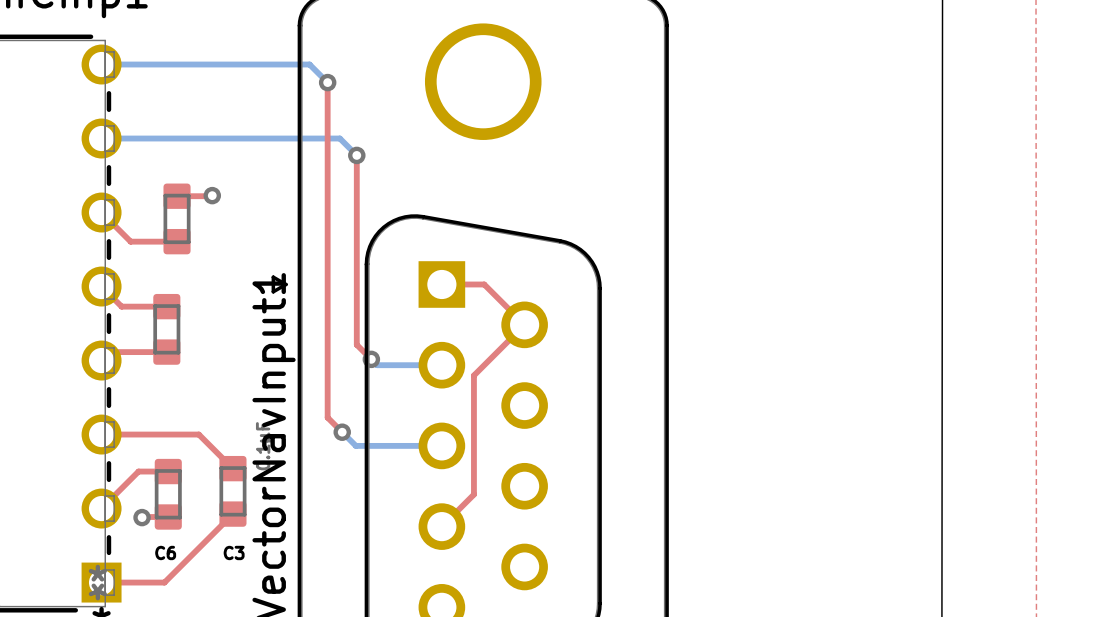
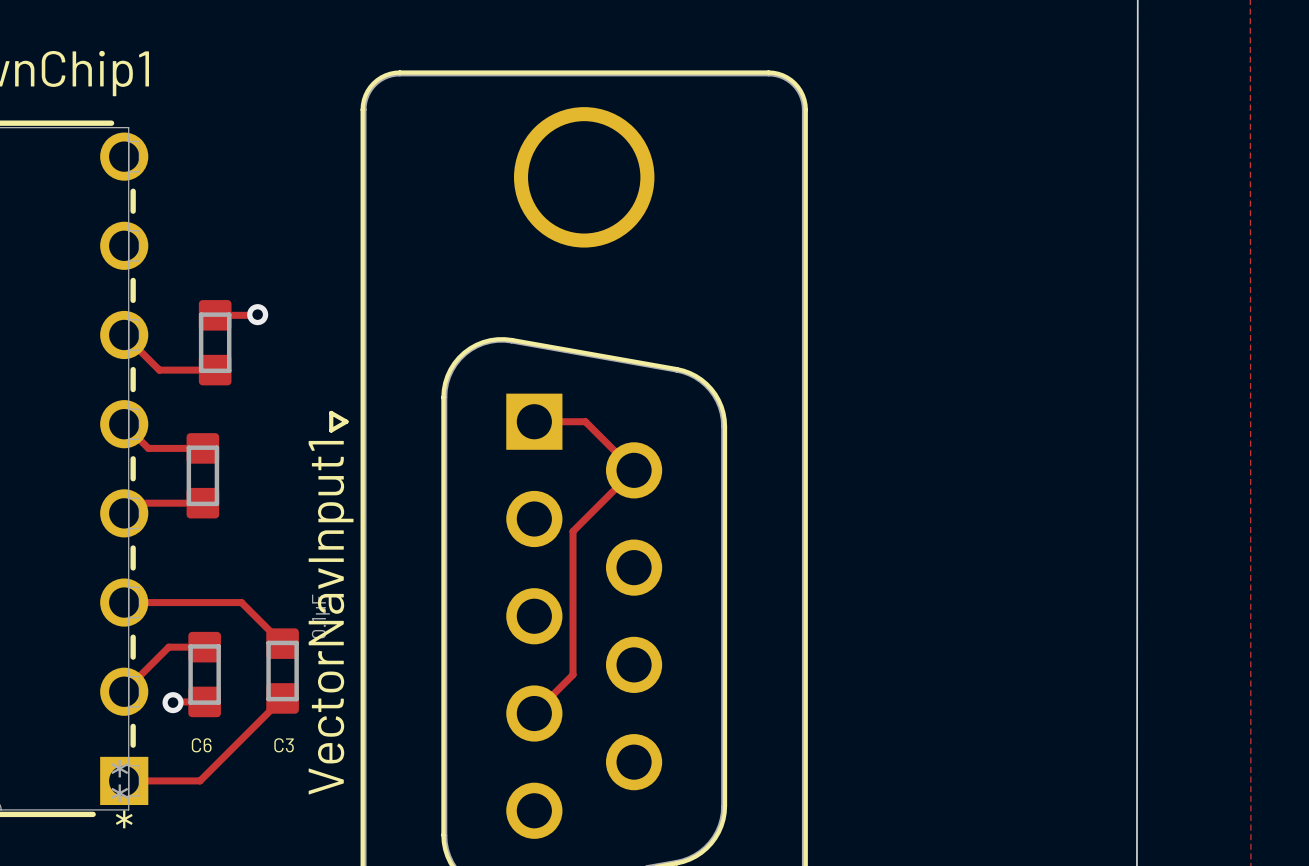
bottom track: (101, 64) (309, 64) (327, 82) -> none
top track: (327, 82) (327, 417) (342, 432) -> none
via: (327, 82) -> none
bottom track: (101, 138) (339, 138) (356, 155) -> none
top track: (356, 155) (356, 344) (371, 359) -> none
via: (356, 155) -> none
bottom track: (371, 359) (377, 365) (441, 365) -> none
via: (371, 359) -> none
bottom track: (342, 432) (355, 445) (441, 445) -> none
via: (342, 432) -> none

